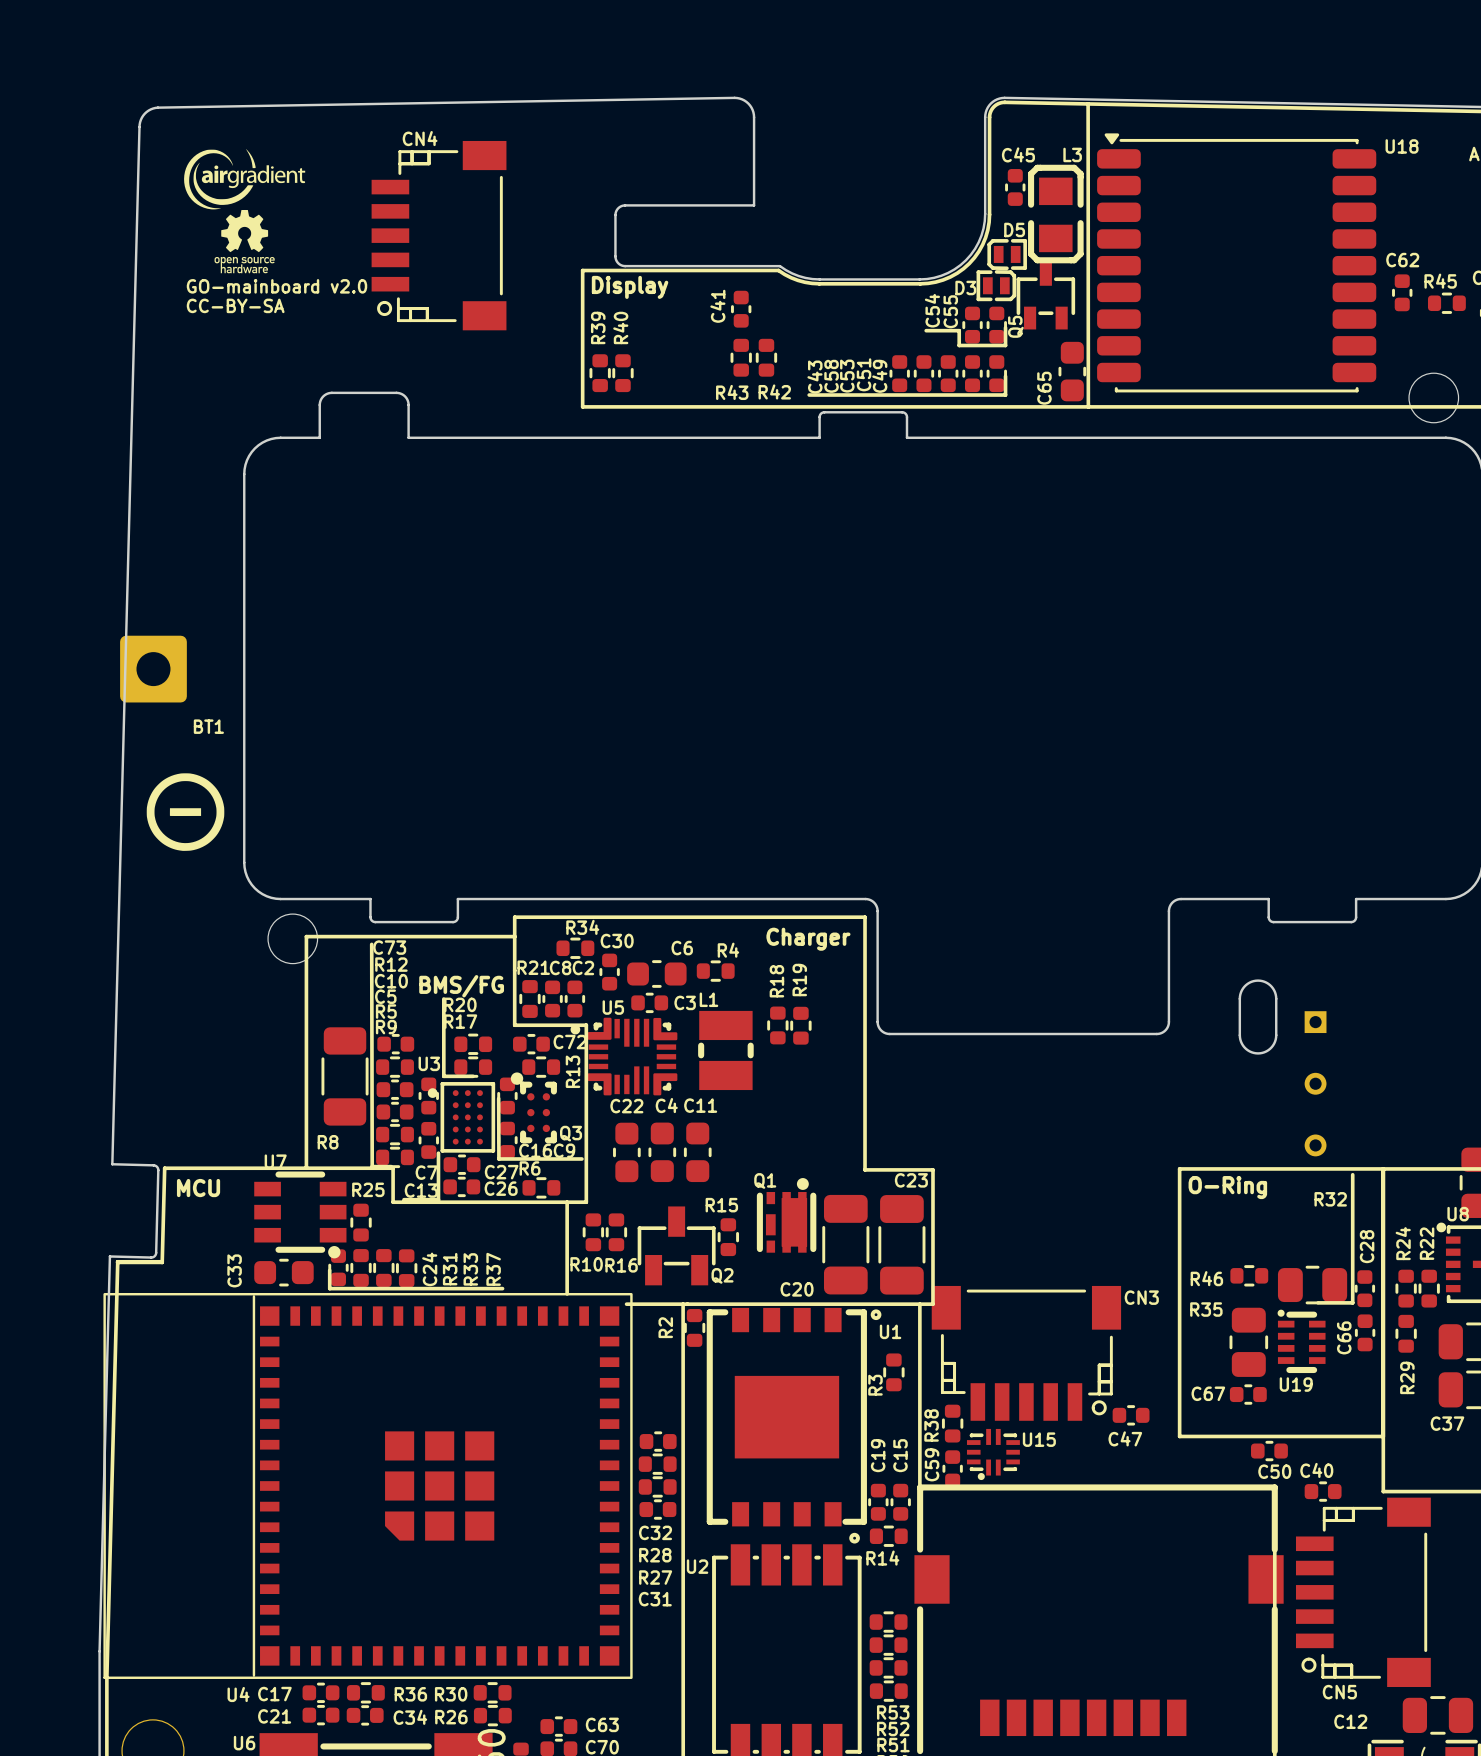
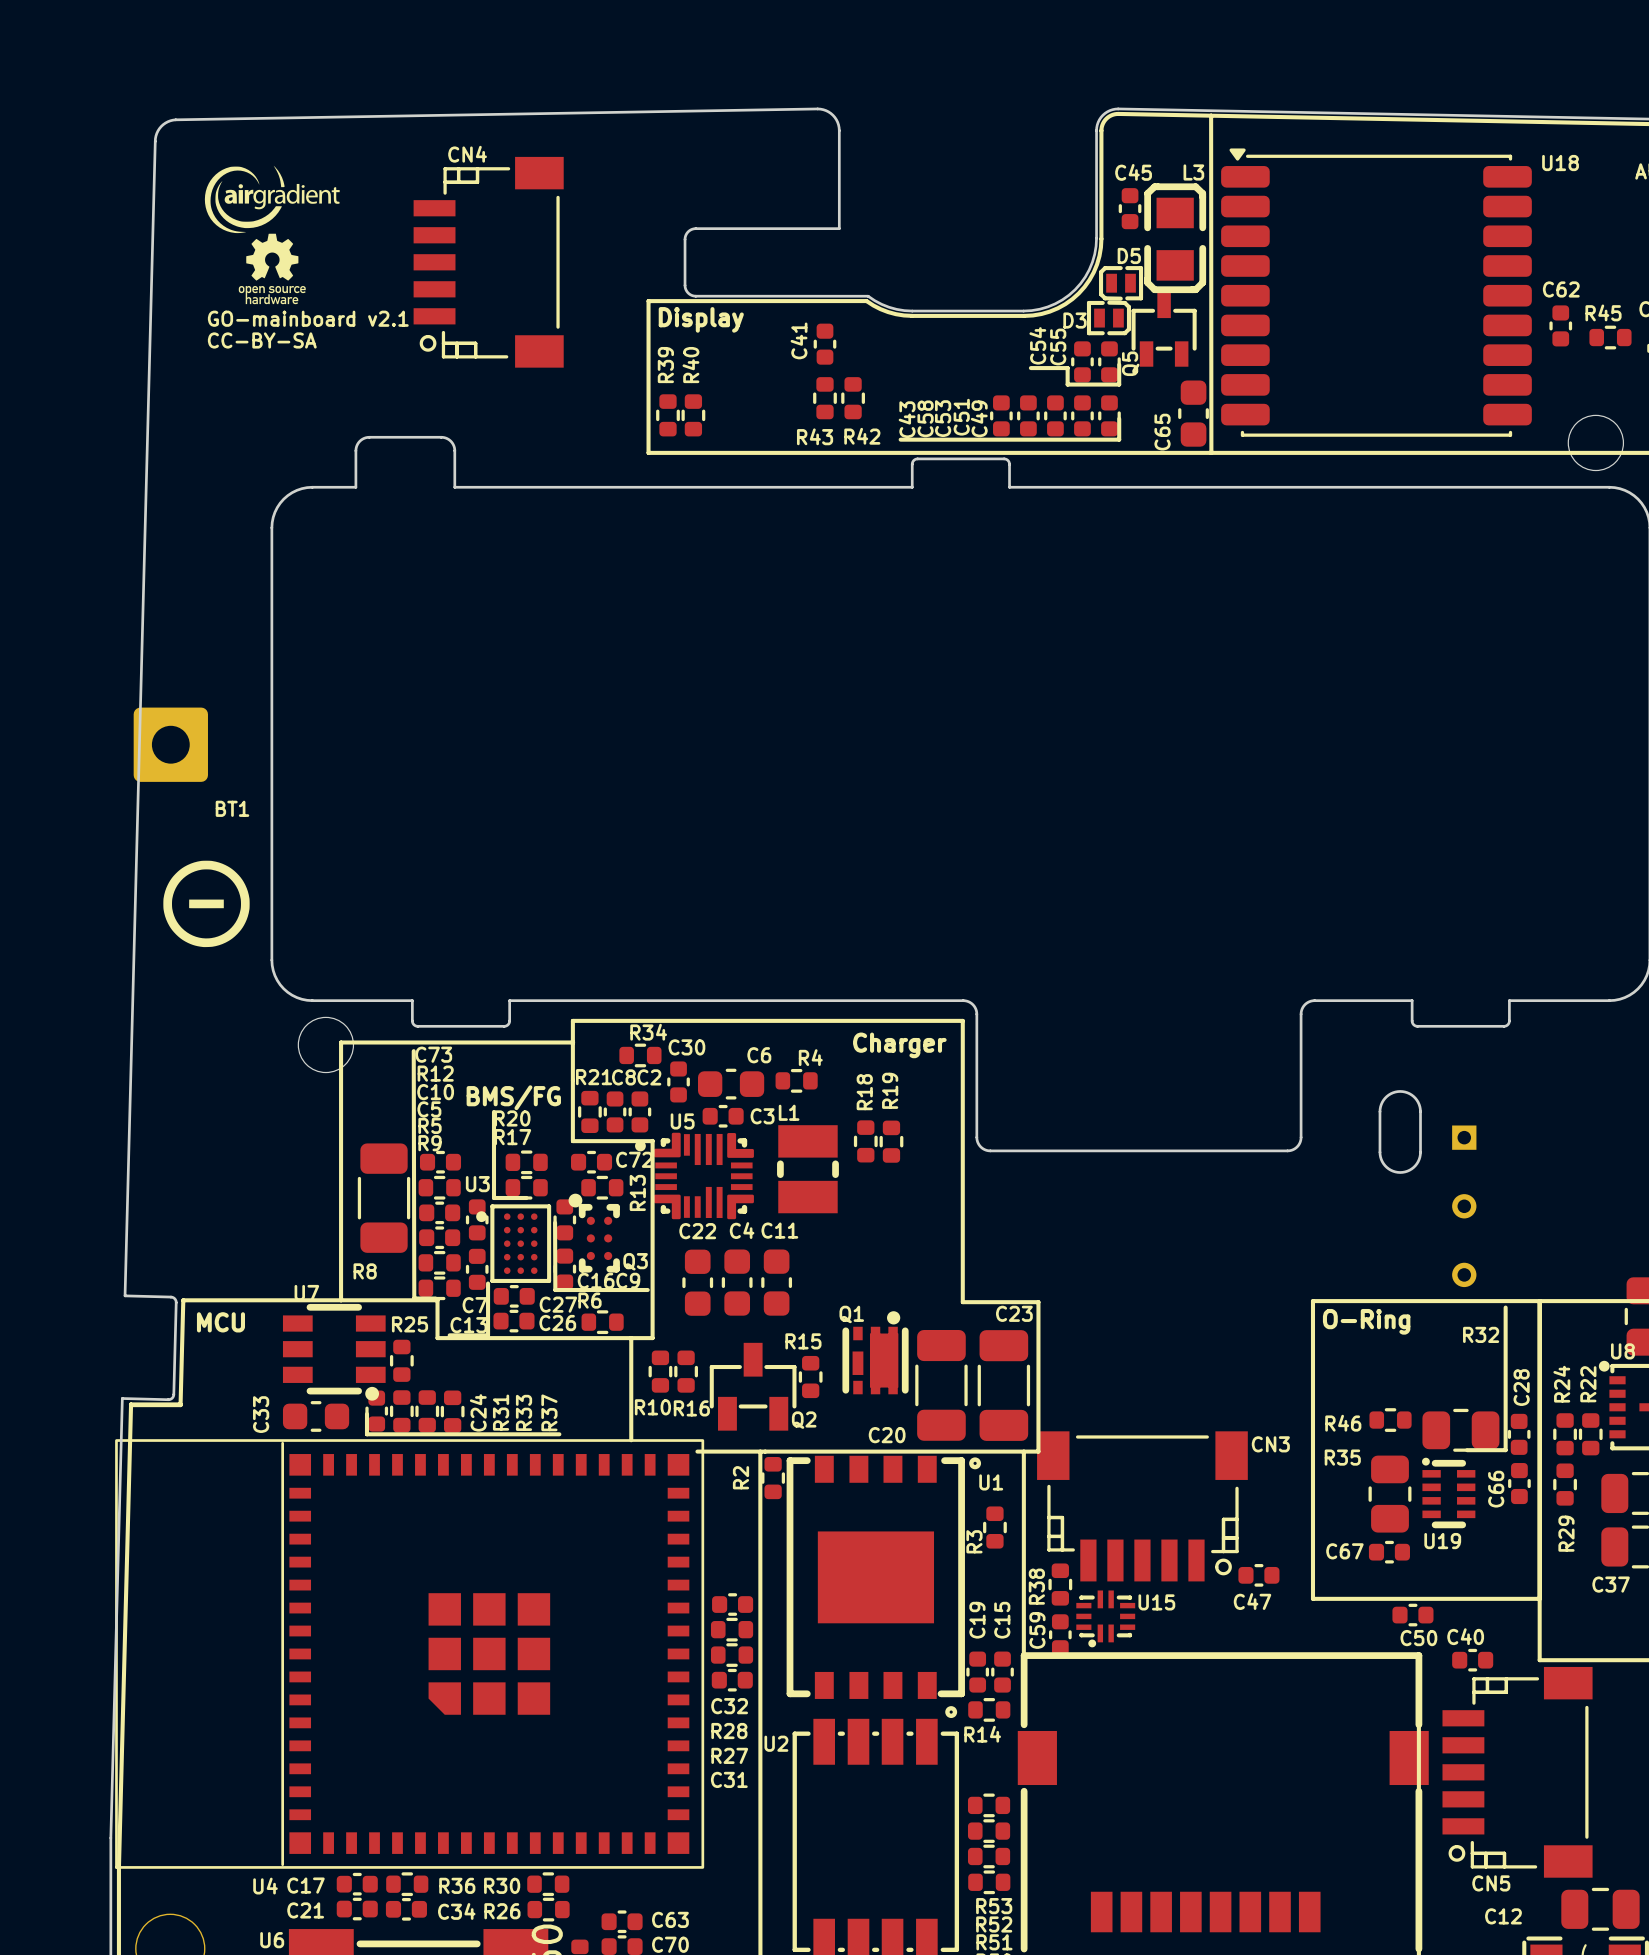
text: GO-mainboard v2.0 (276, 286) -> GO-mainboard v2.1 (308, 318)

